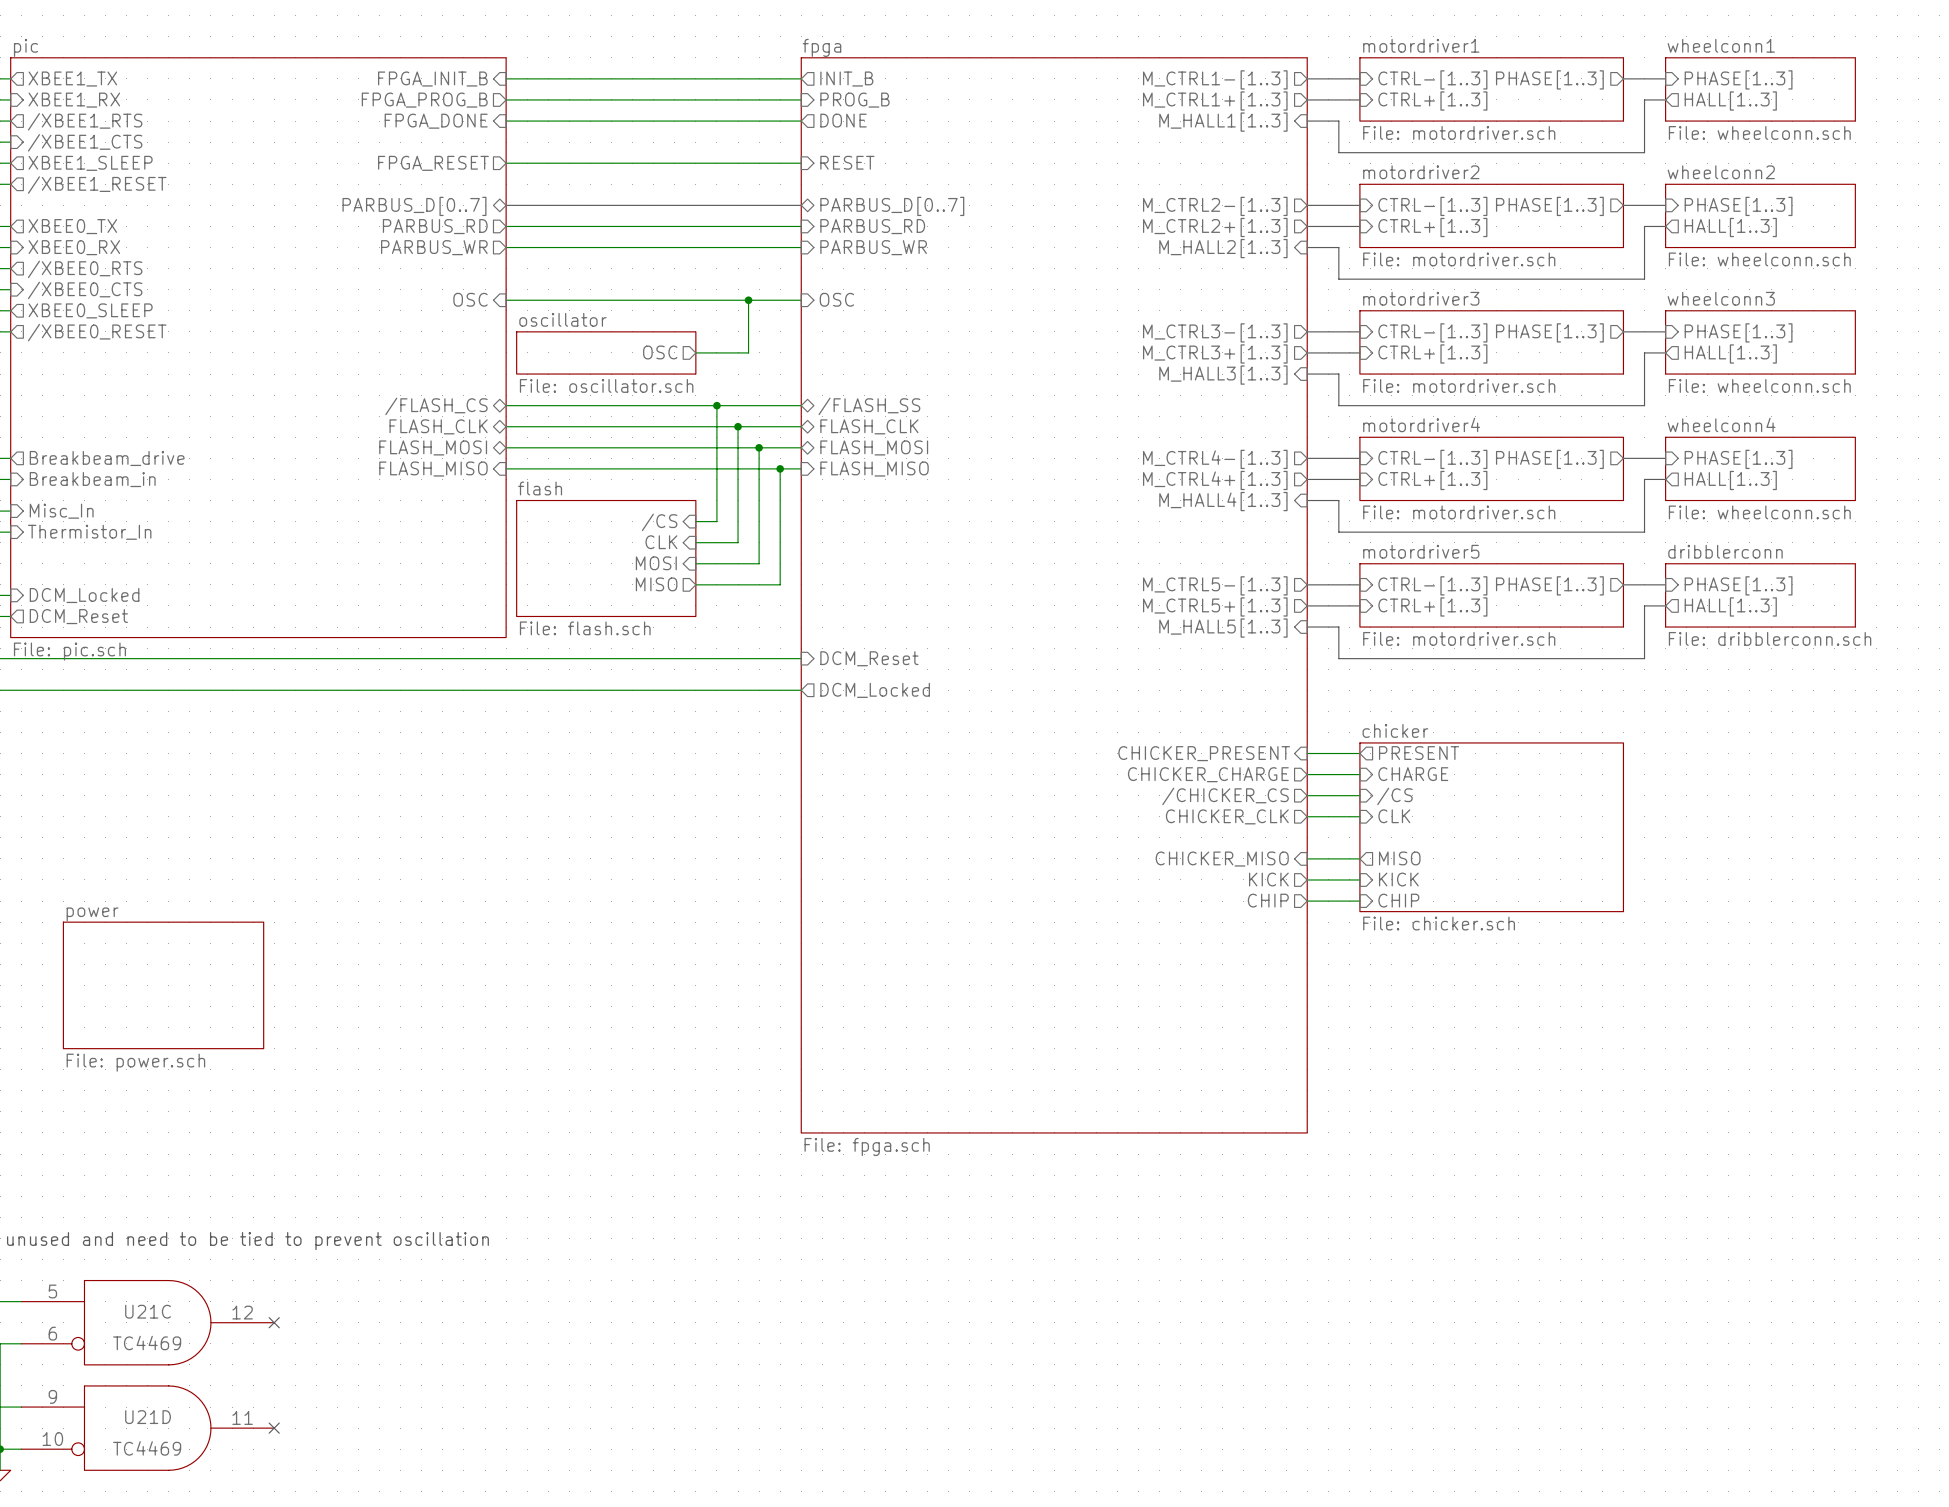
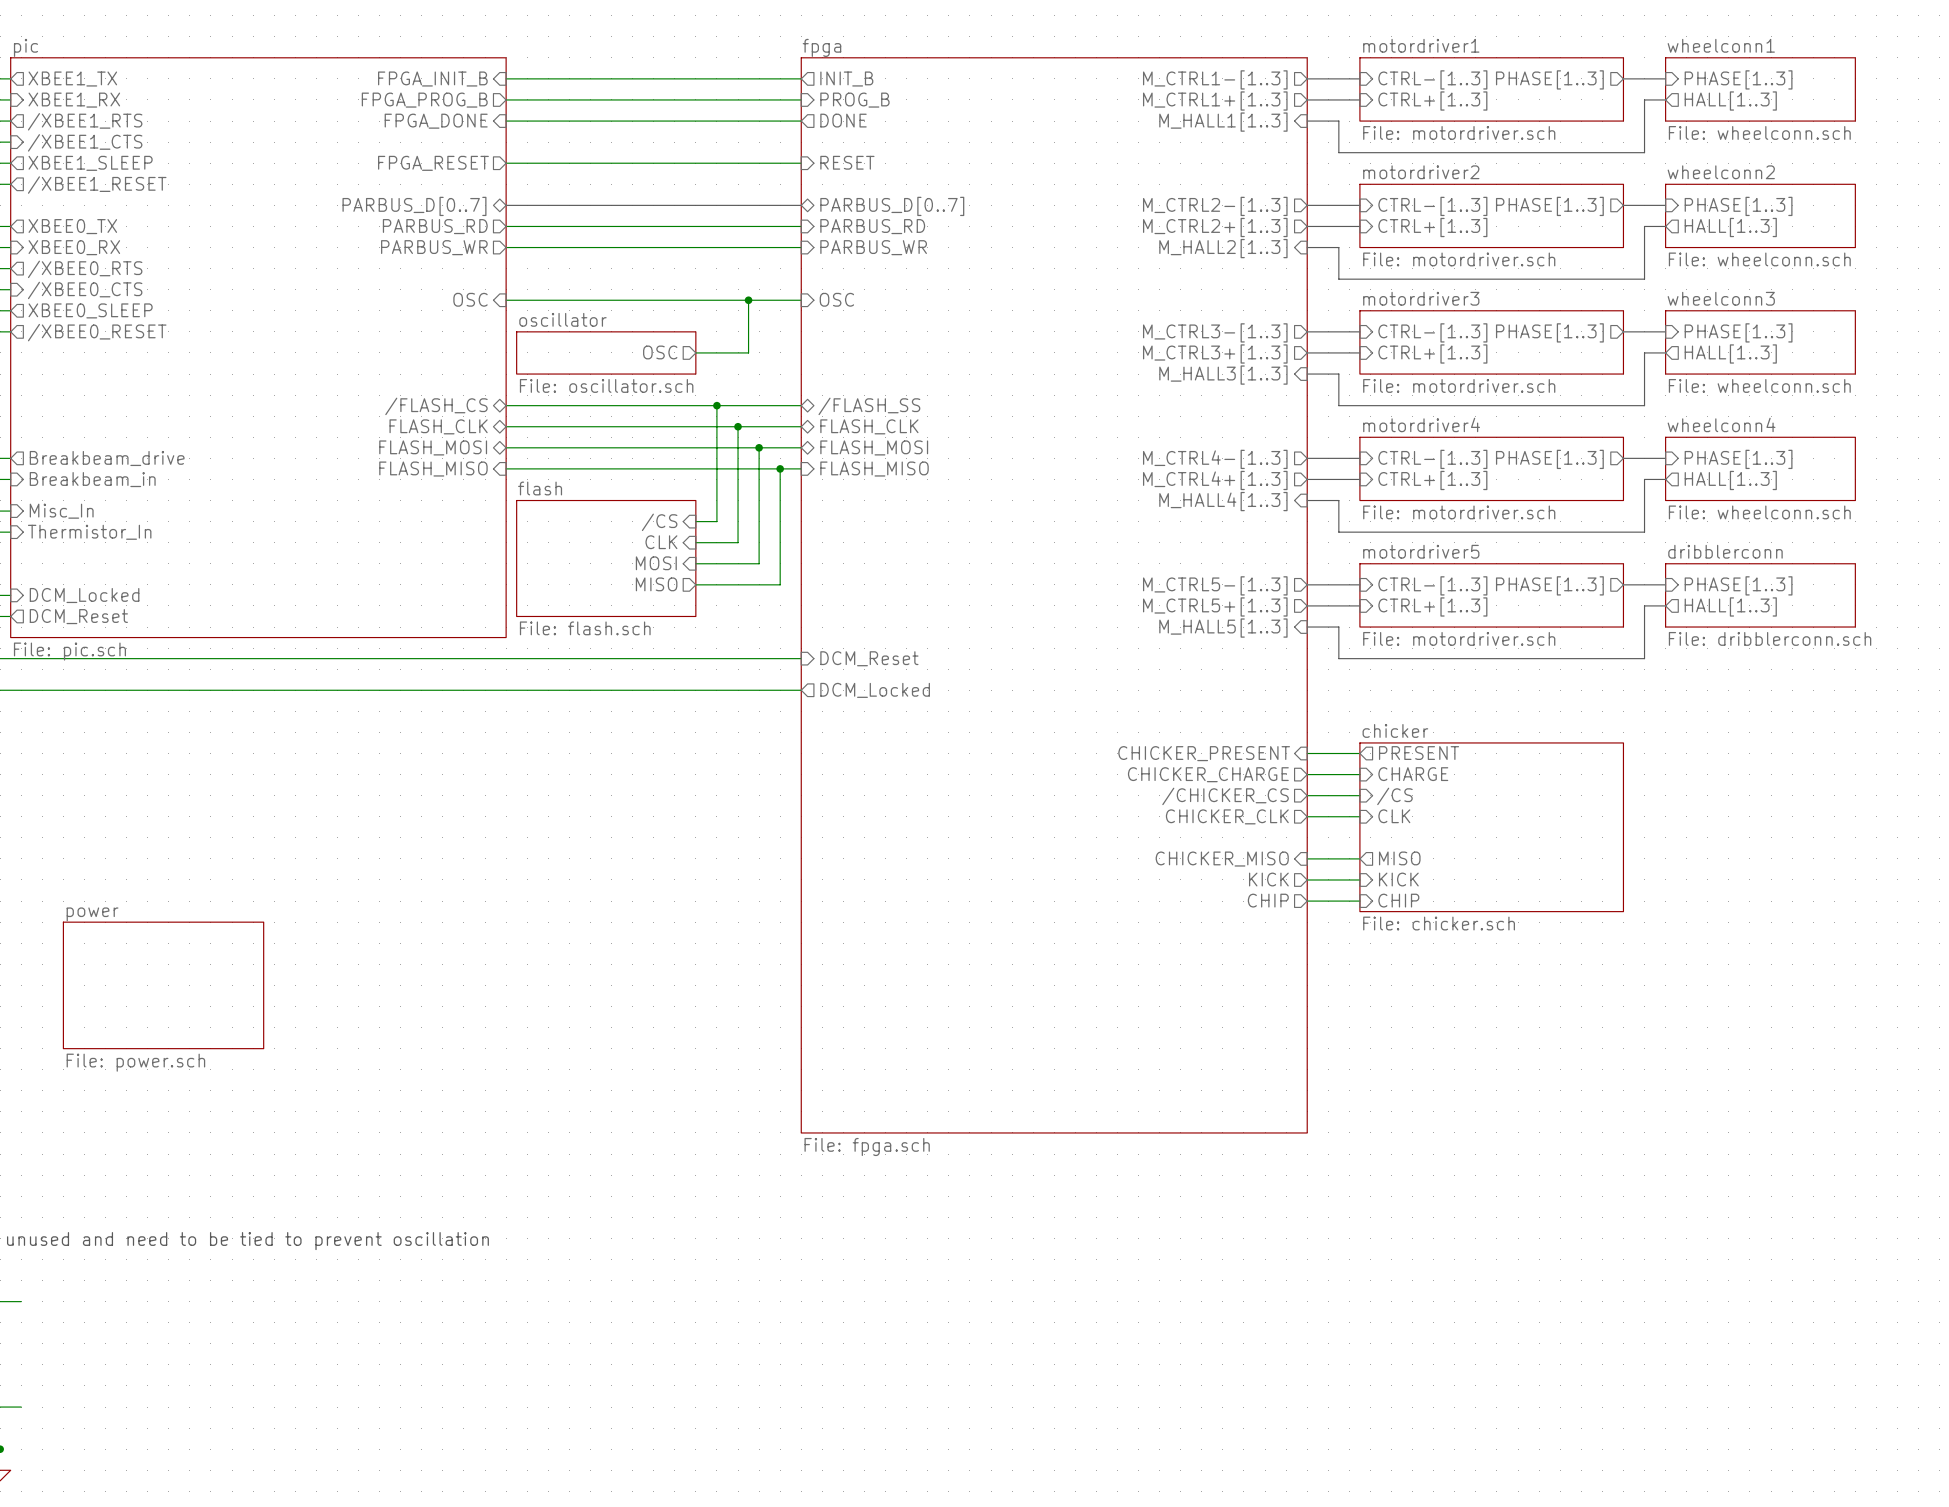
U21C: TC4469 (147, 1322) -> none
no-connect mark: (274, 1322) -> none
wire: (21, 1343) (0, 1343) (0, 1470) -> none
U21D: TC4469 (147, 1428) -> none
no-connect mark: (274, 1428) -> none
wire: (0, 1449) (21, 1449) -> none

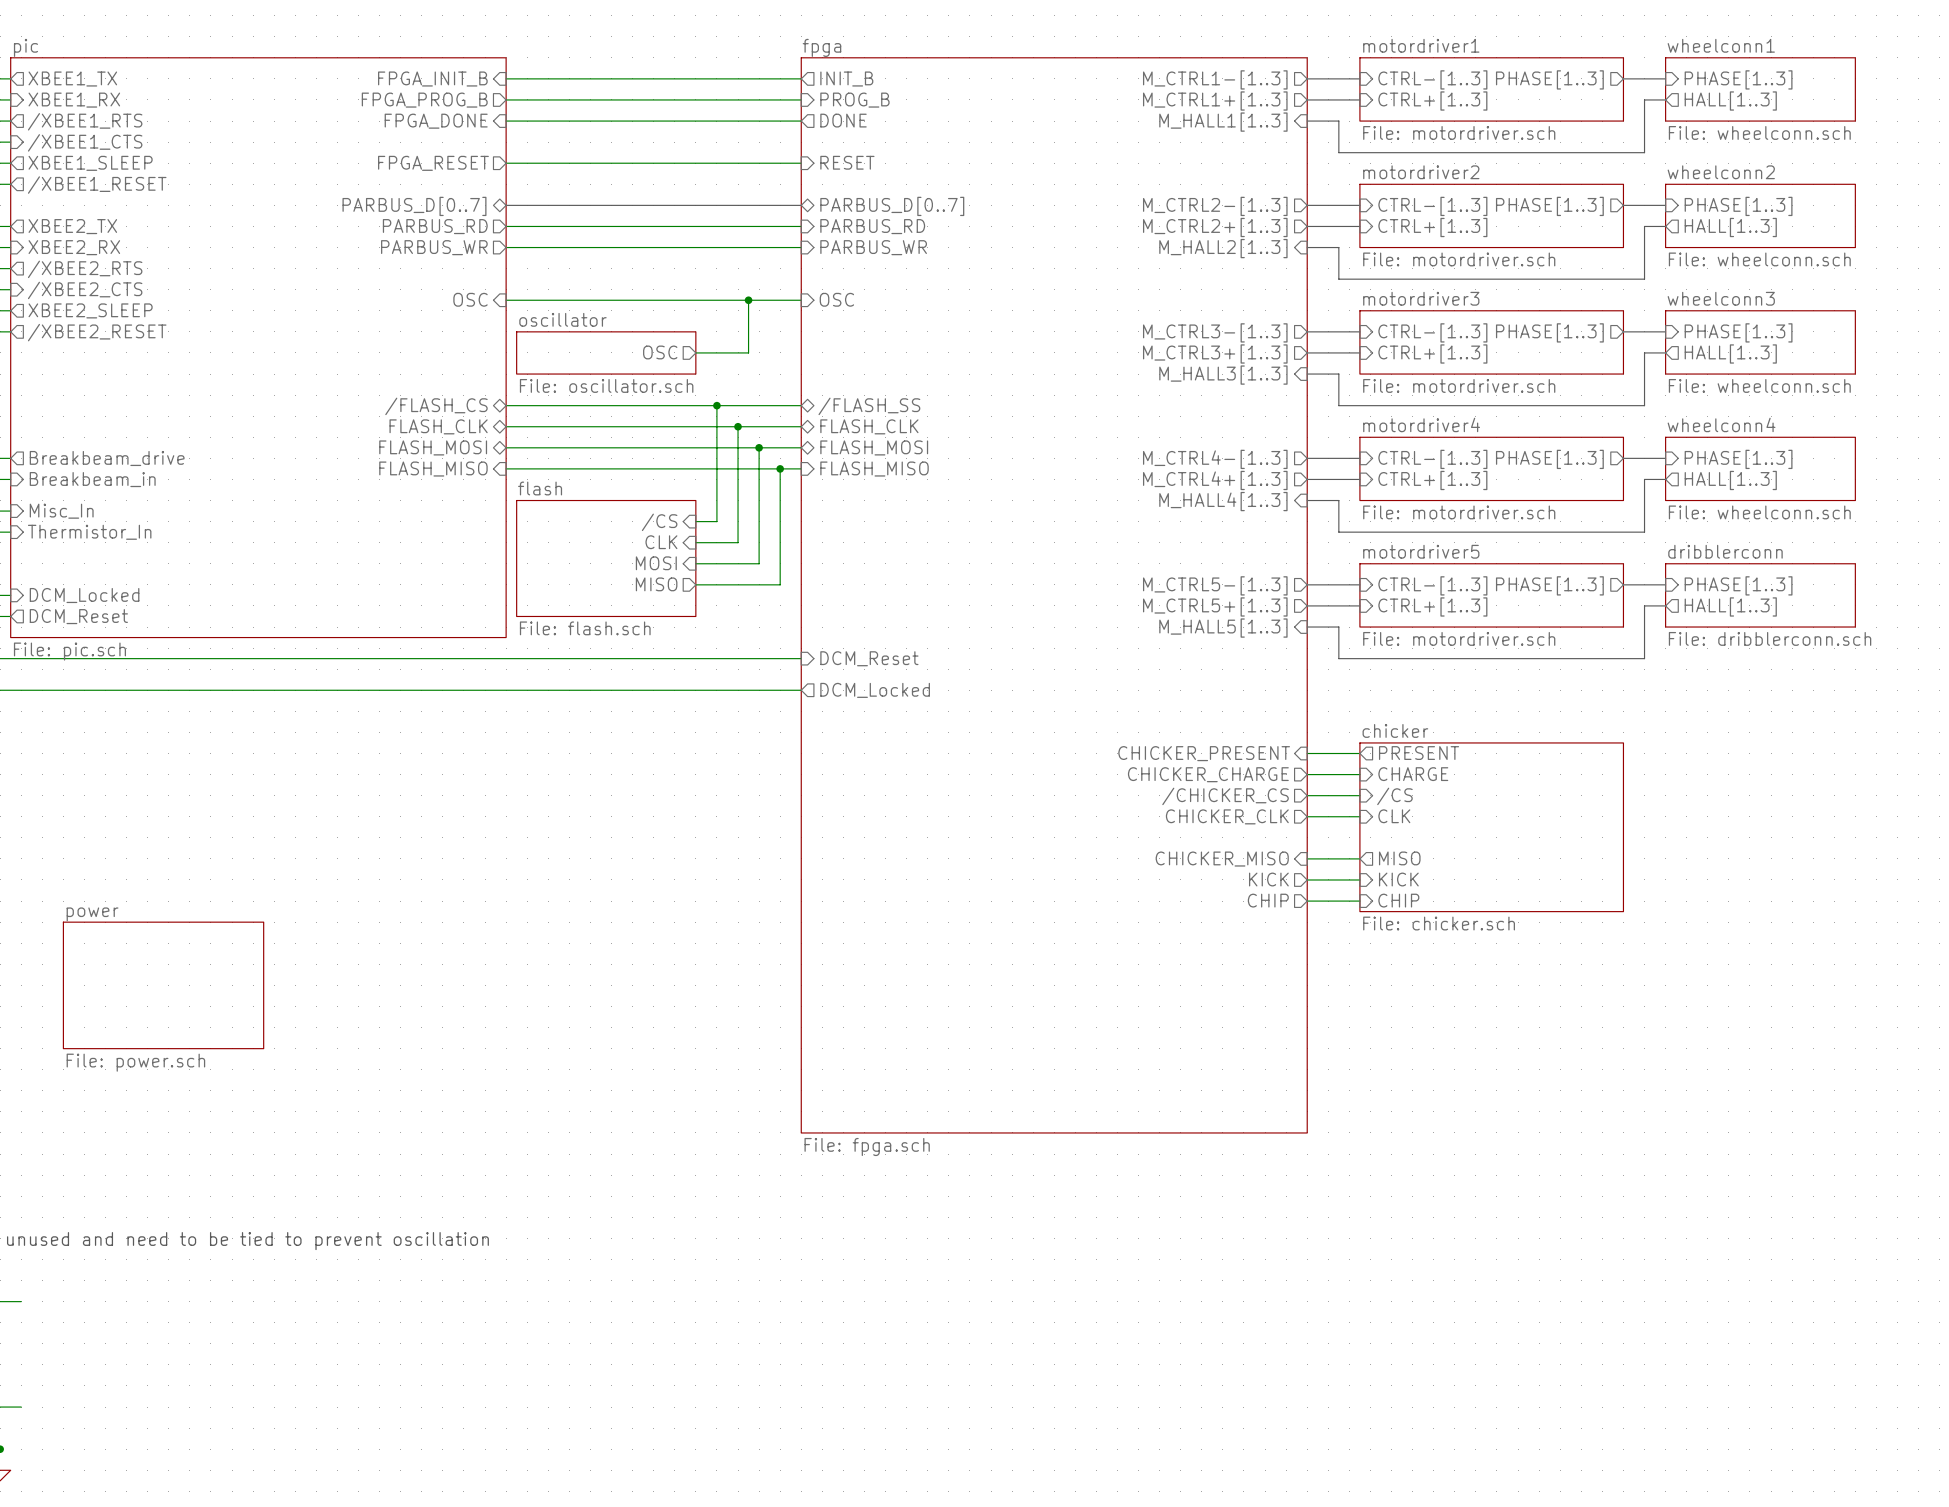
sheet pin: XBEE0_TX (72, 226) -> XBEE2_TX (72, 226)
sheet pin: XBEE0_RX (74, 247) -> XBEE2_RX (74, 247)
sheet pin: /XBEE0_RTS (85, 269) -> /XBEE2_RTS (85, 269)
sheet pin: /XBEE0_CTS (85, 290) -> /XBEE2_CTS (85, 290)
sheet pin: XBEE0_SLEEP (90, 310) -> XBEE2_SLEEP (90, 310)
sheet pin: /XBEE0_RESET (97, 332) -> /XBEE2_RESET (97, 332)

